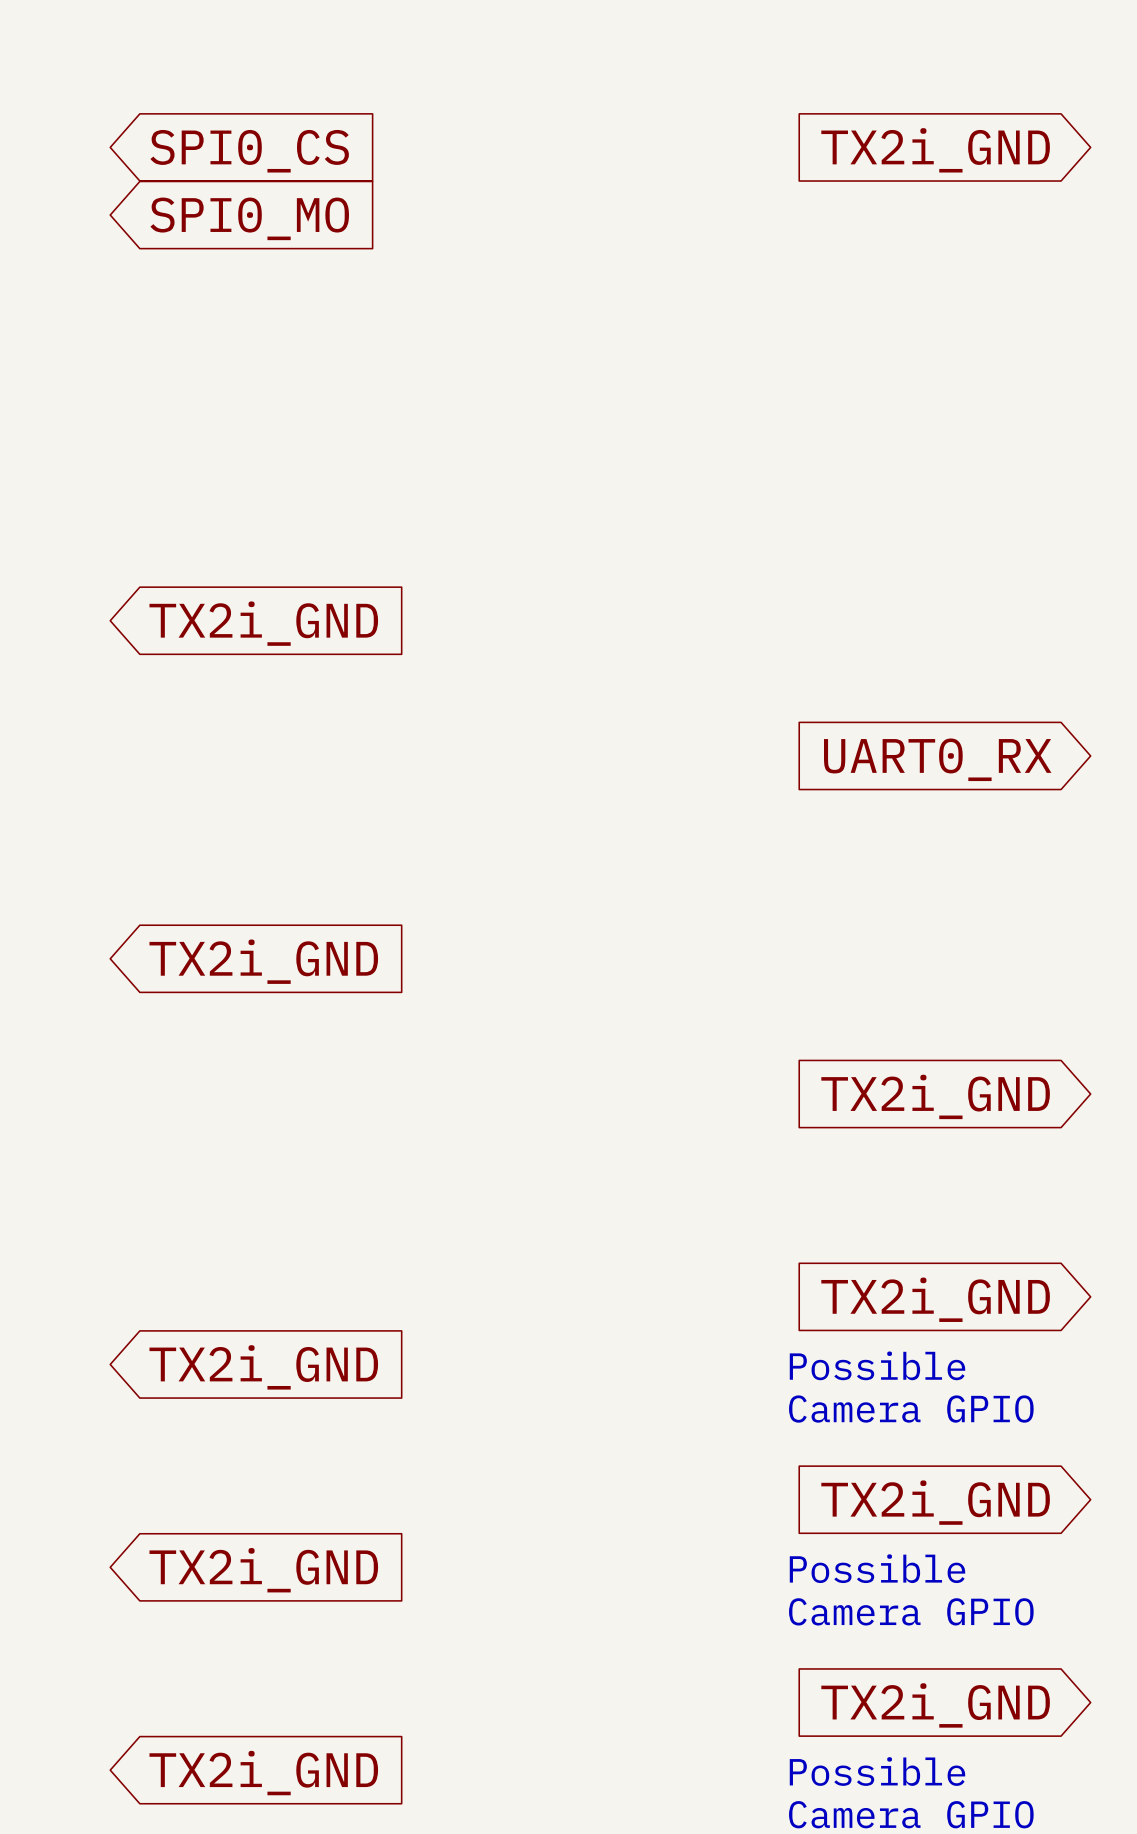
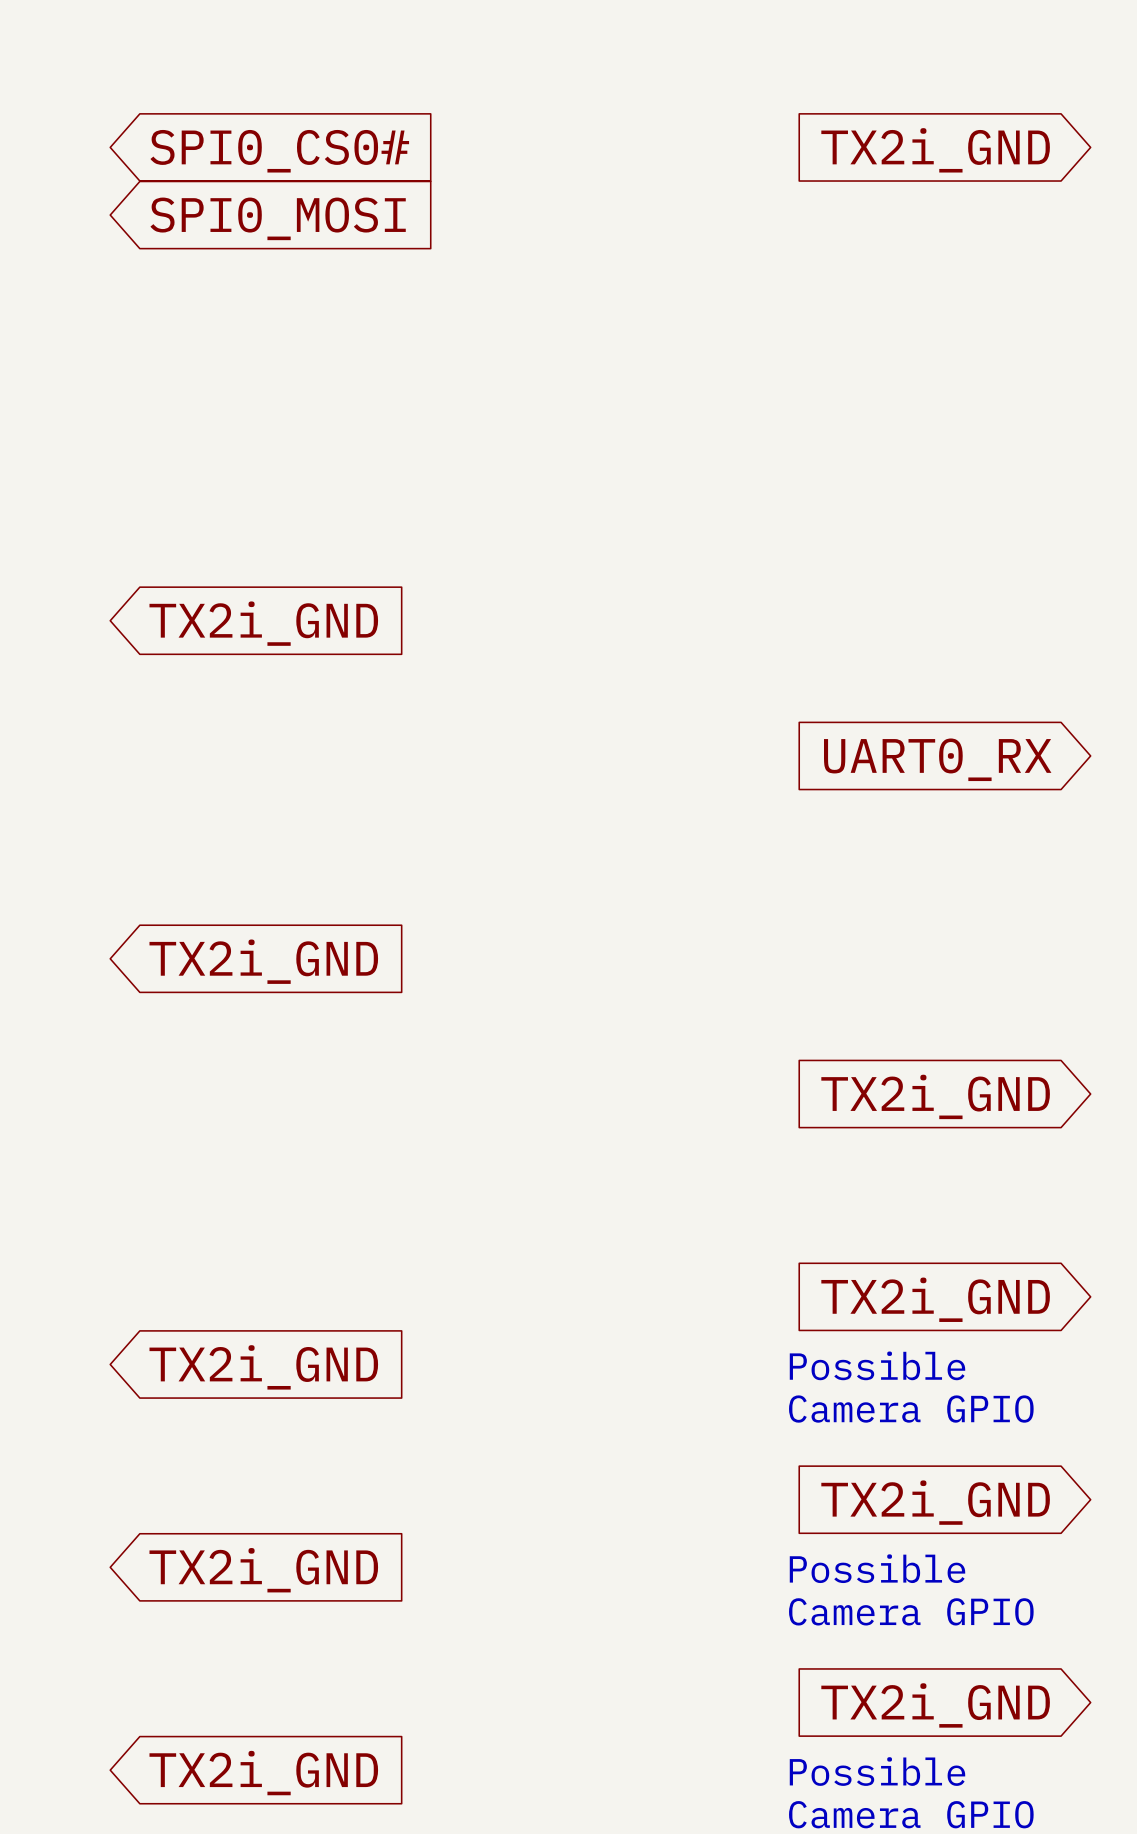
global label: SPI0_CS (249, 151) -> SPI0_CS0# (279, 151)
global label: SPI0_MO (249, 218) -> SPI0_MOSI (278, 218)

